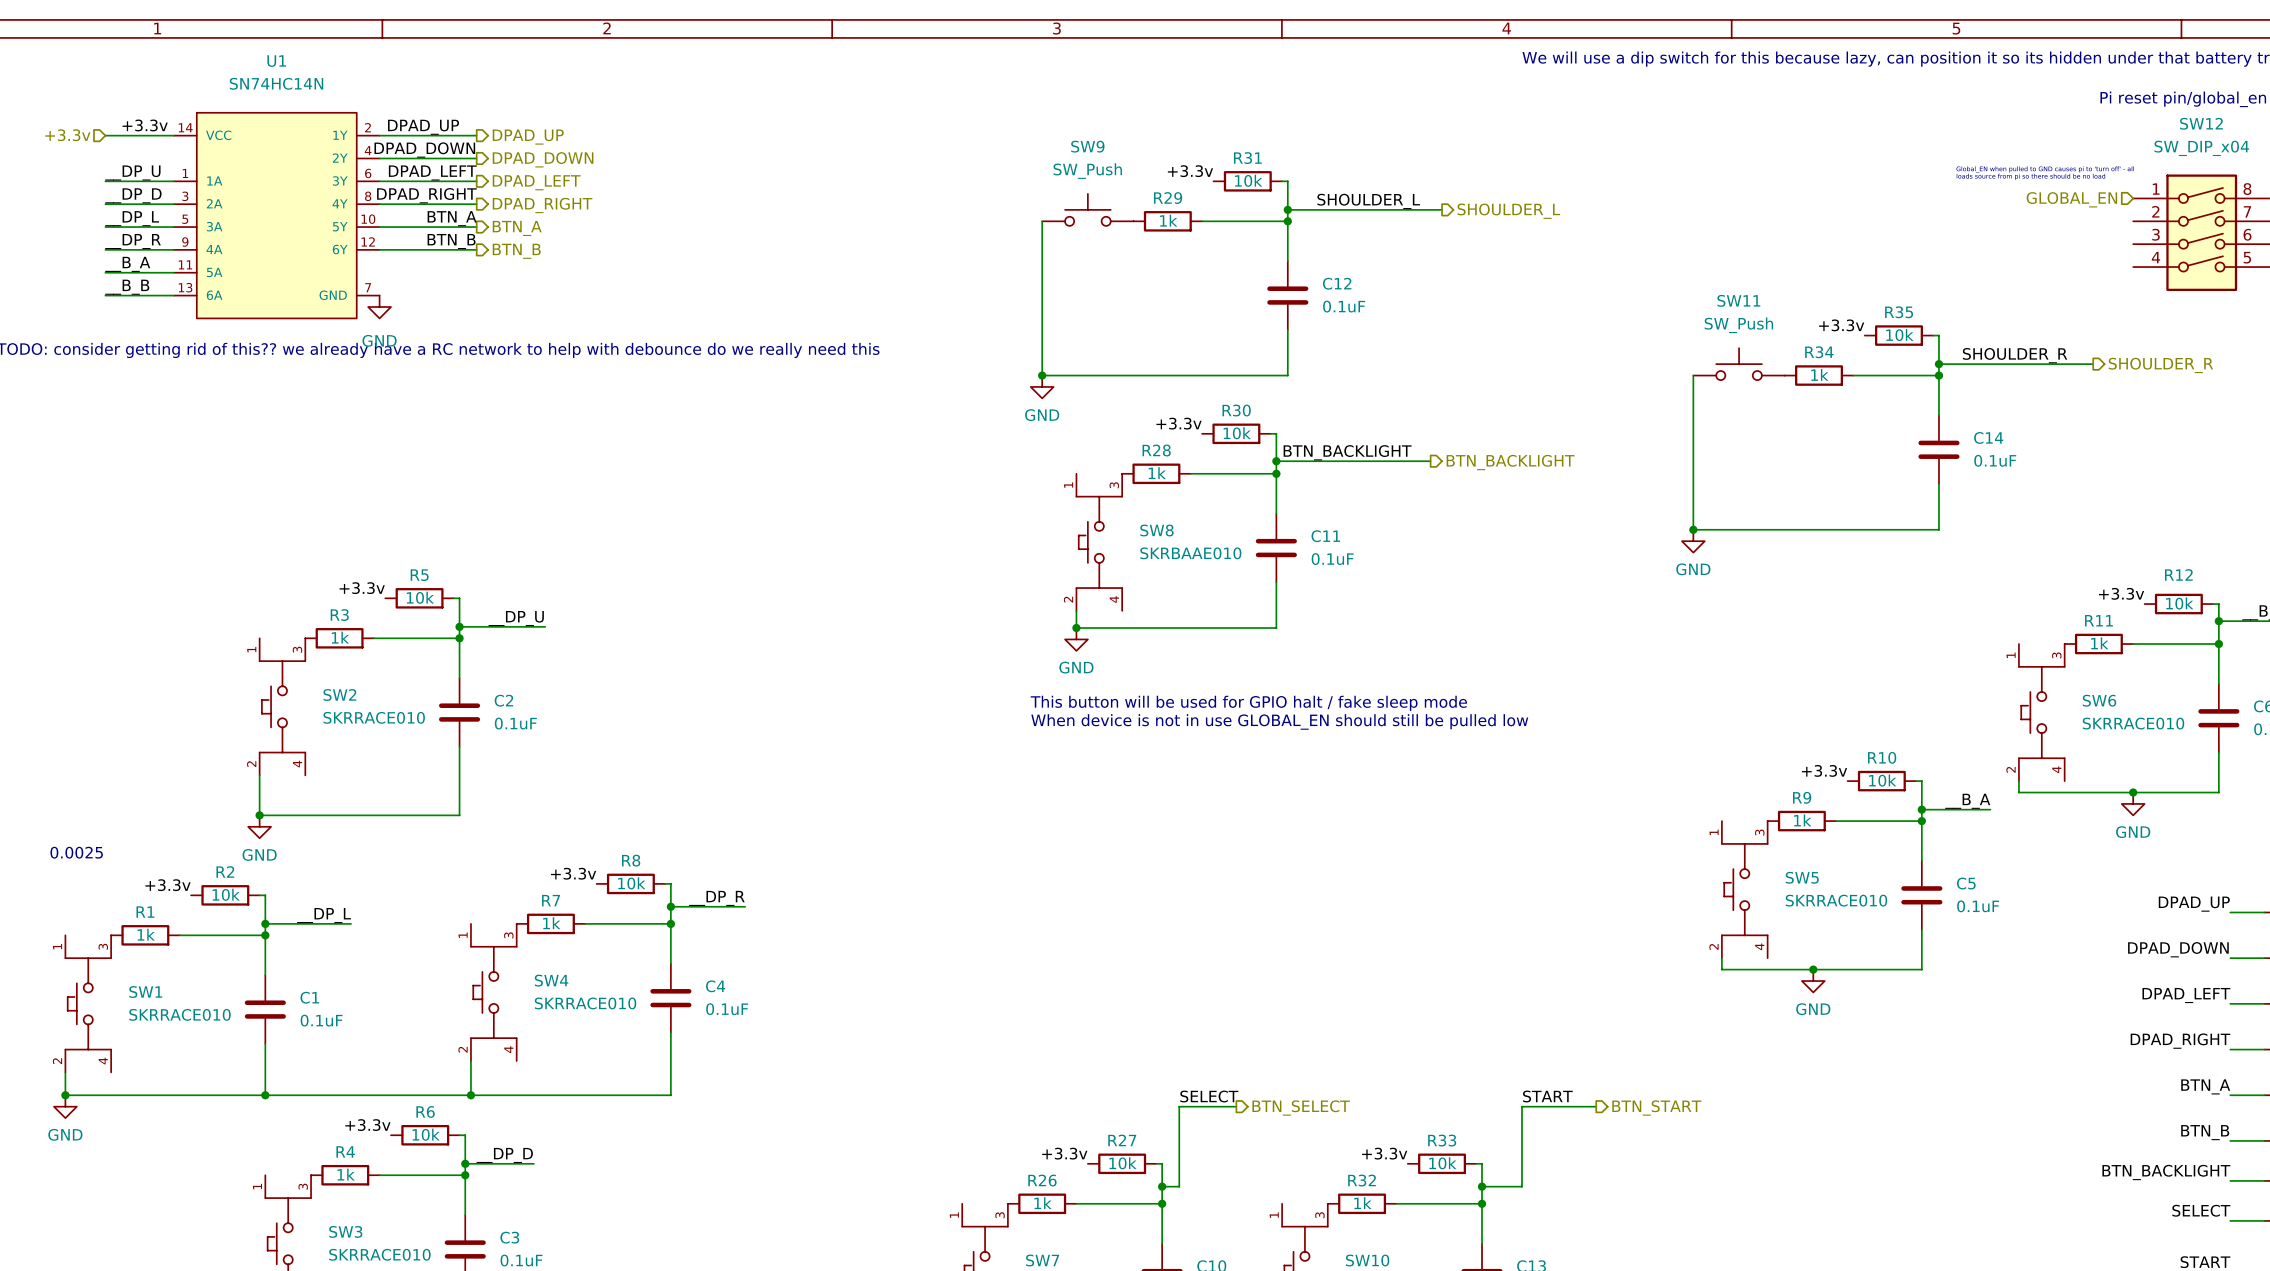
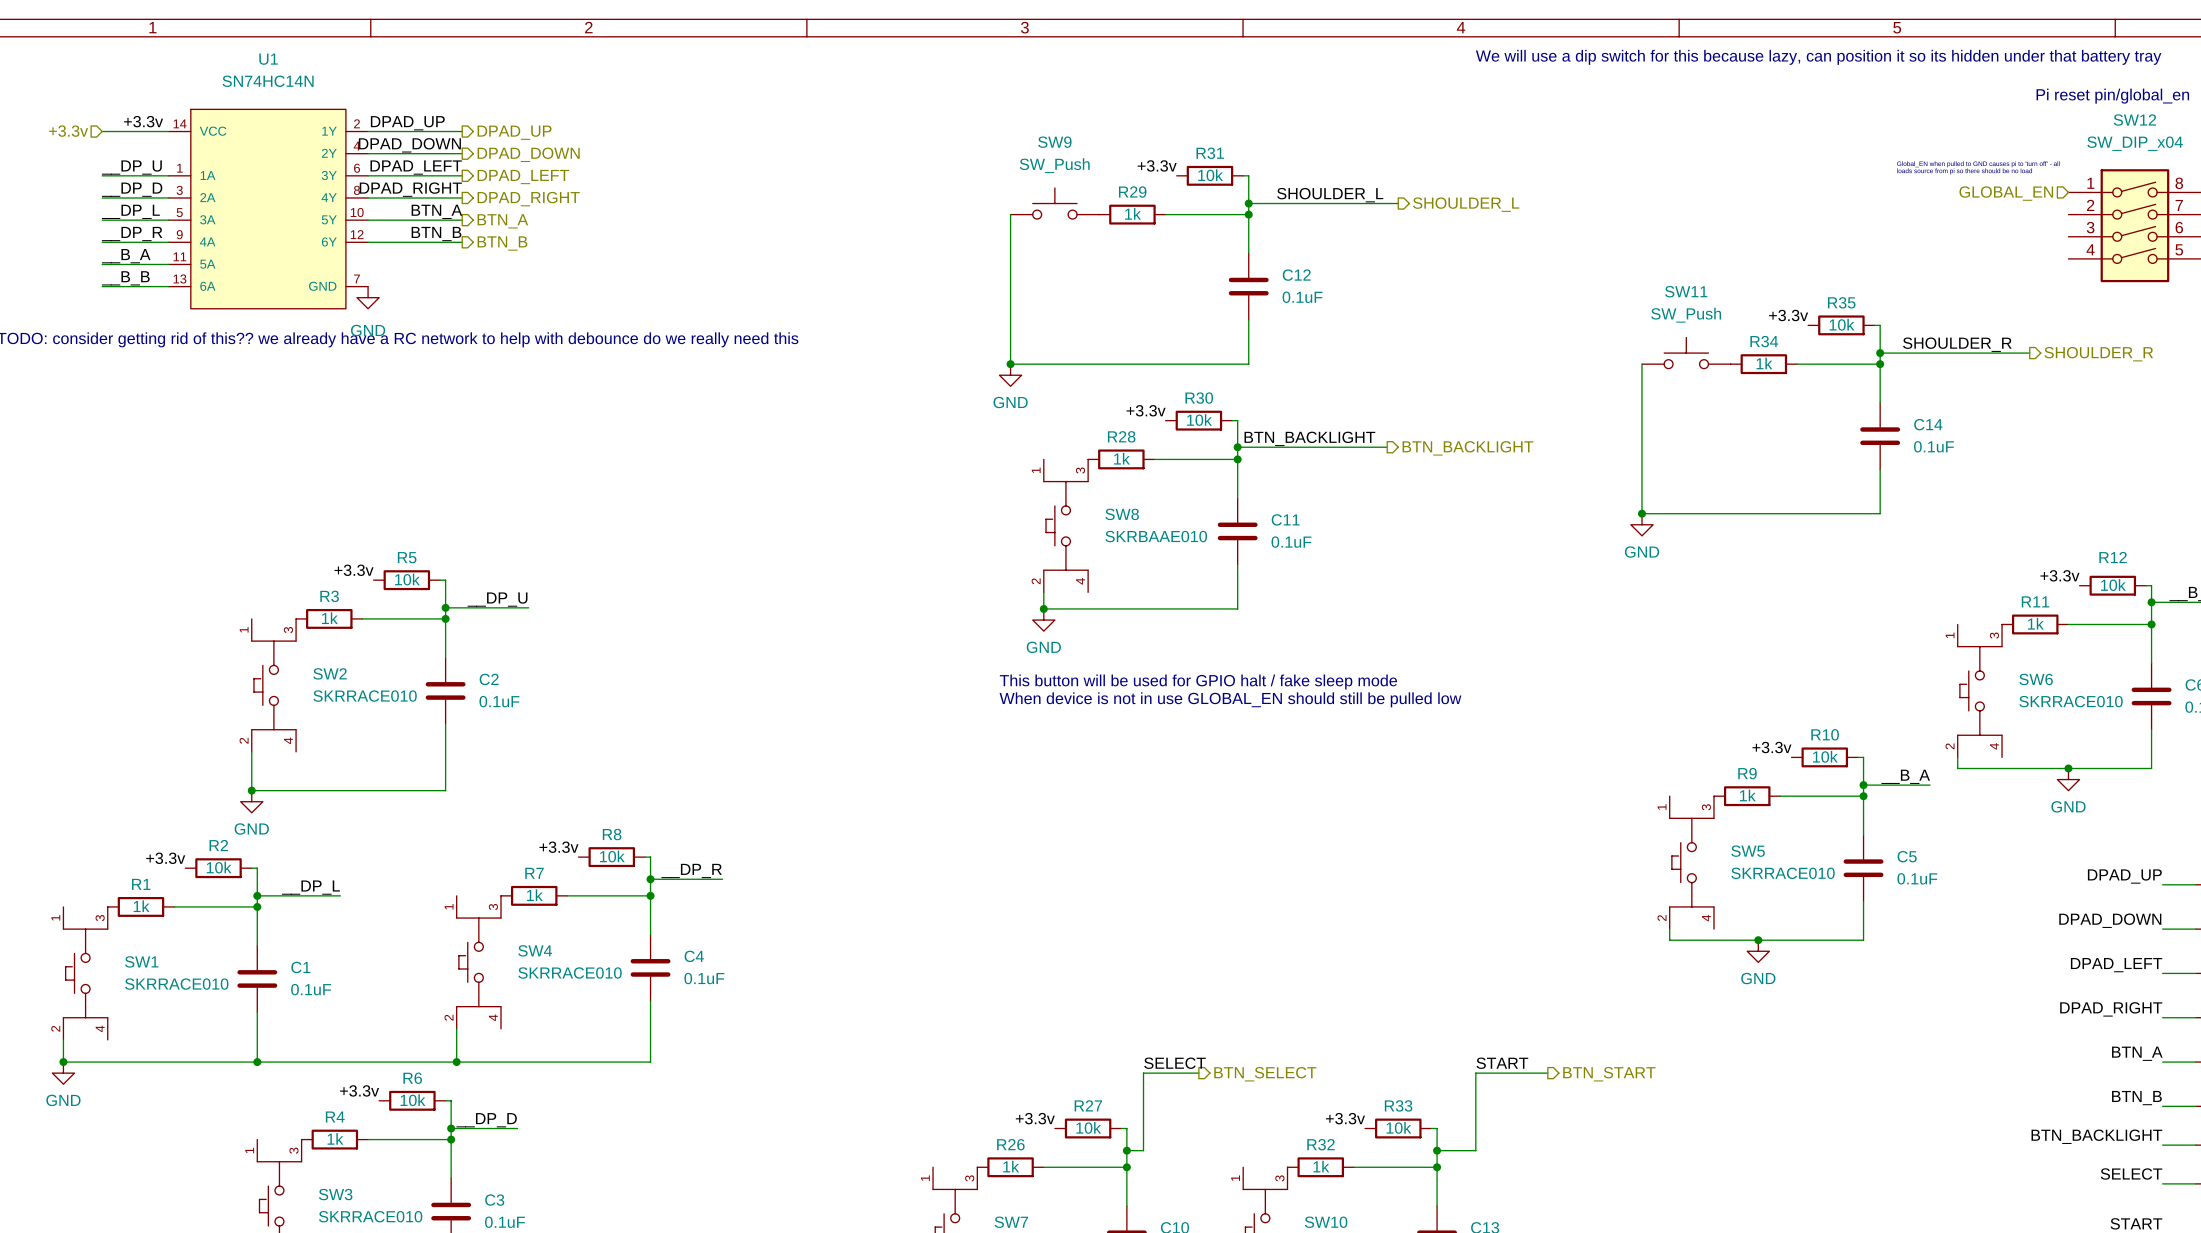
text: 0.0025 (76, 852) -> none

